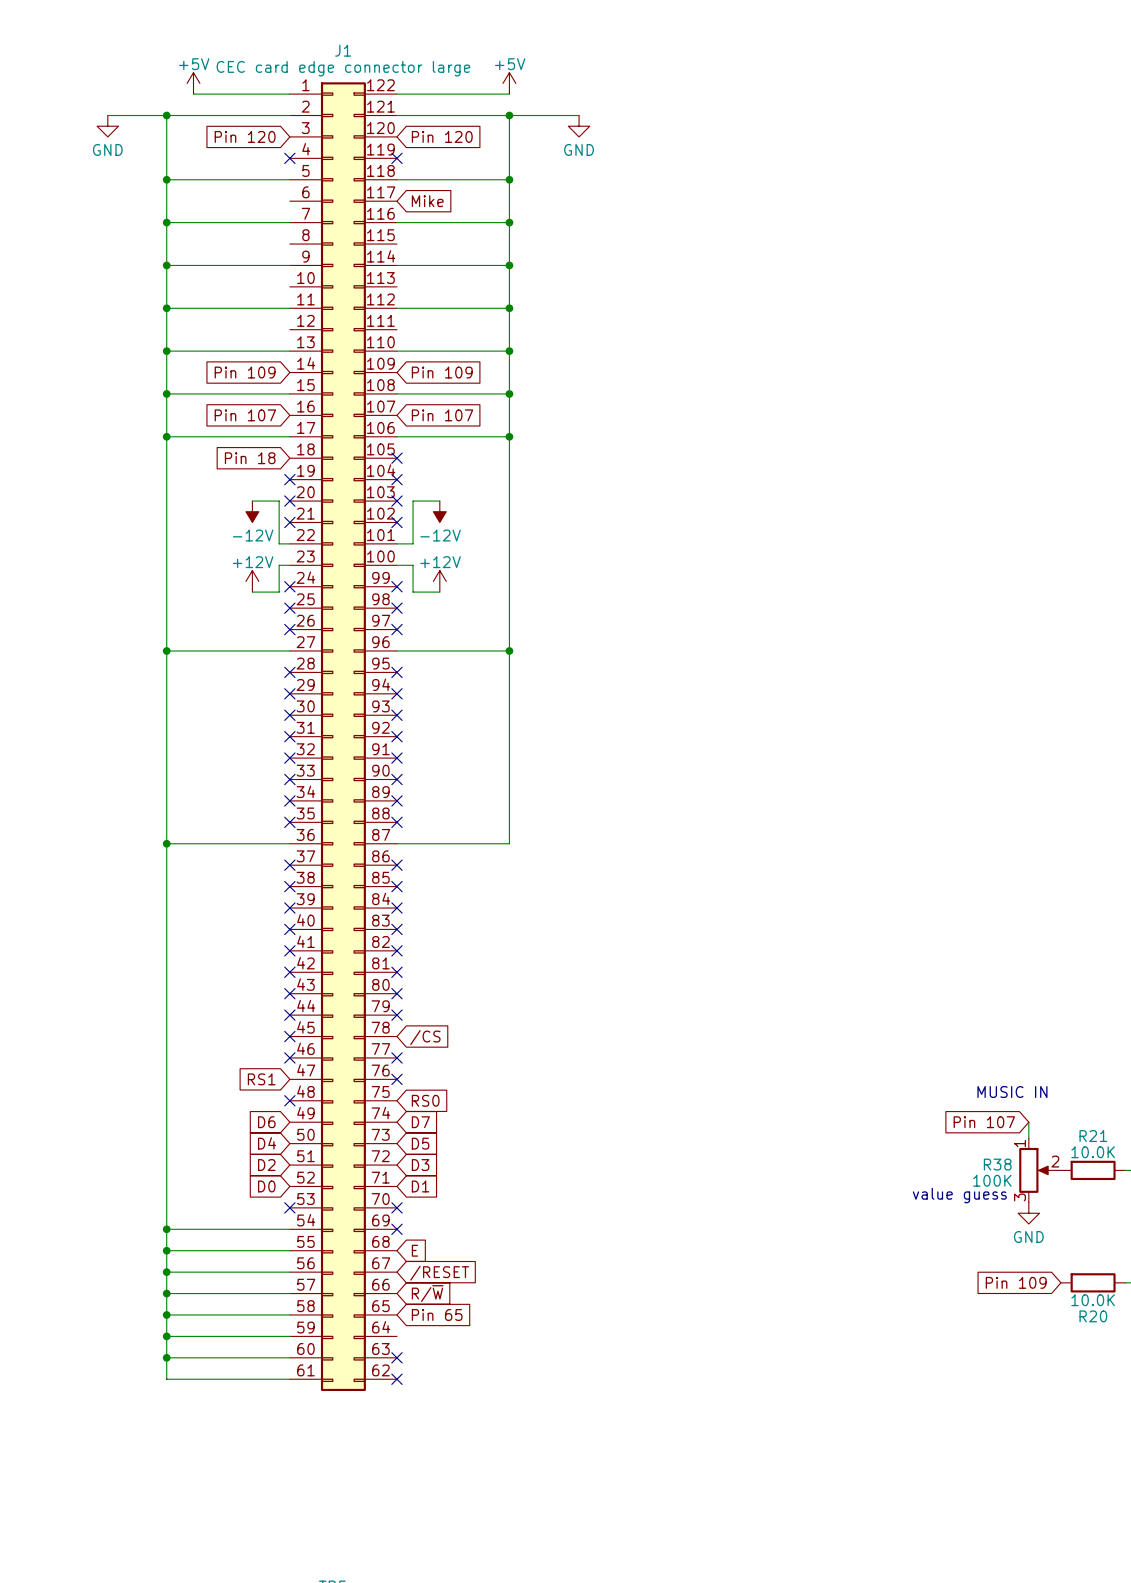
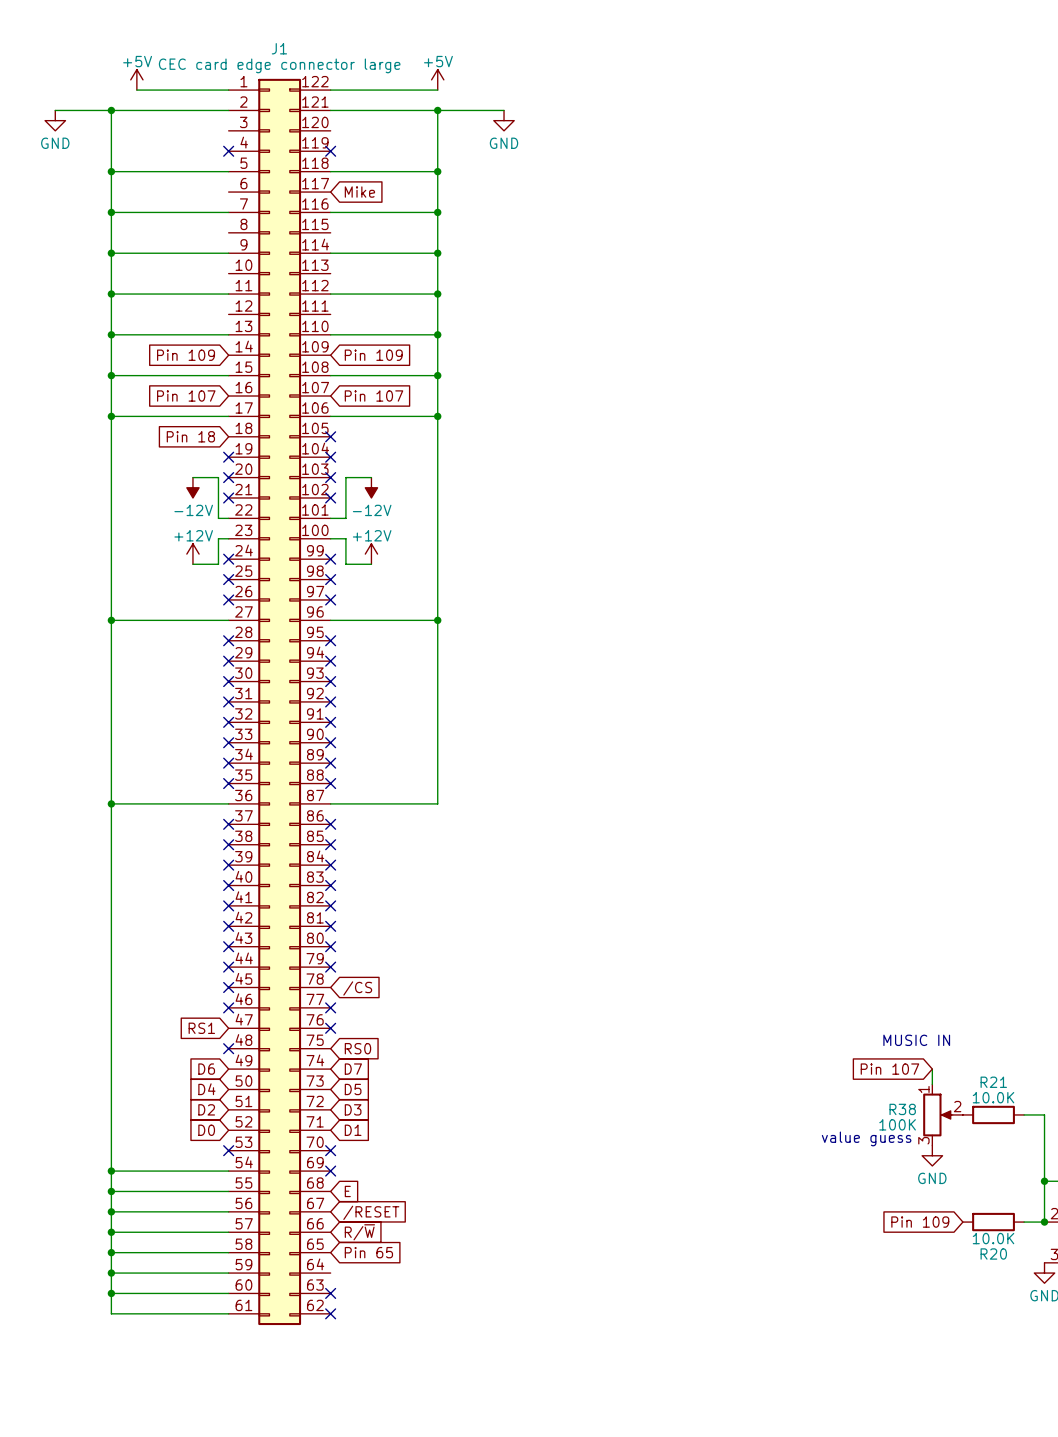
global label: Pin 120 (245, 136) -> none
global label: Pin 120 (442, 136) -> none

